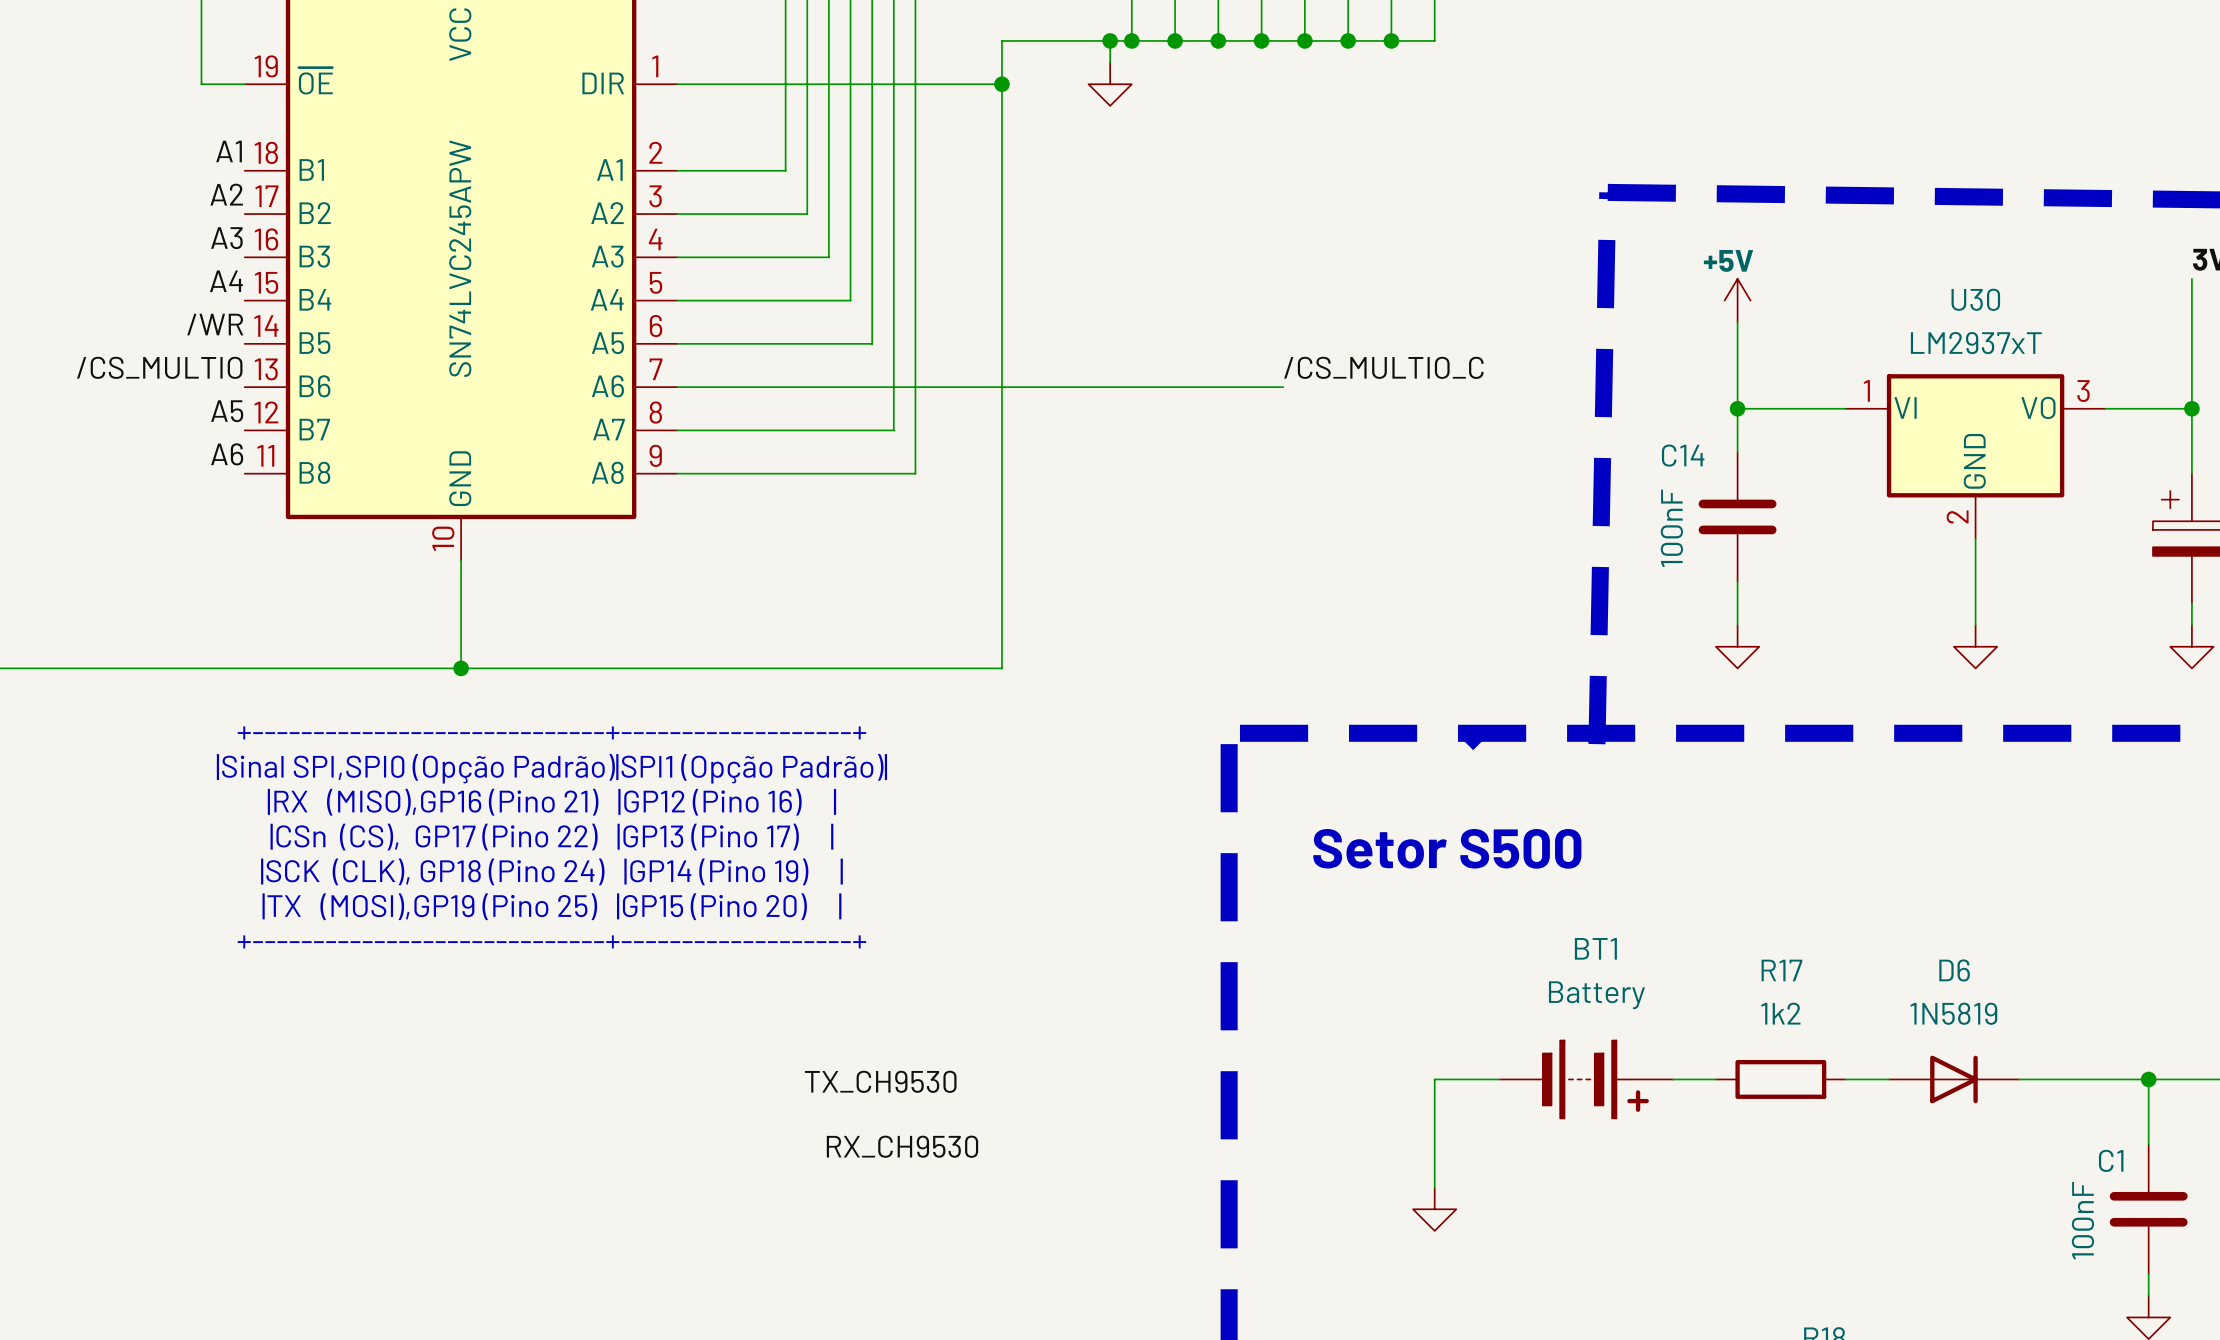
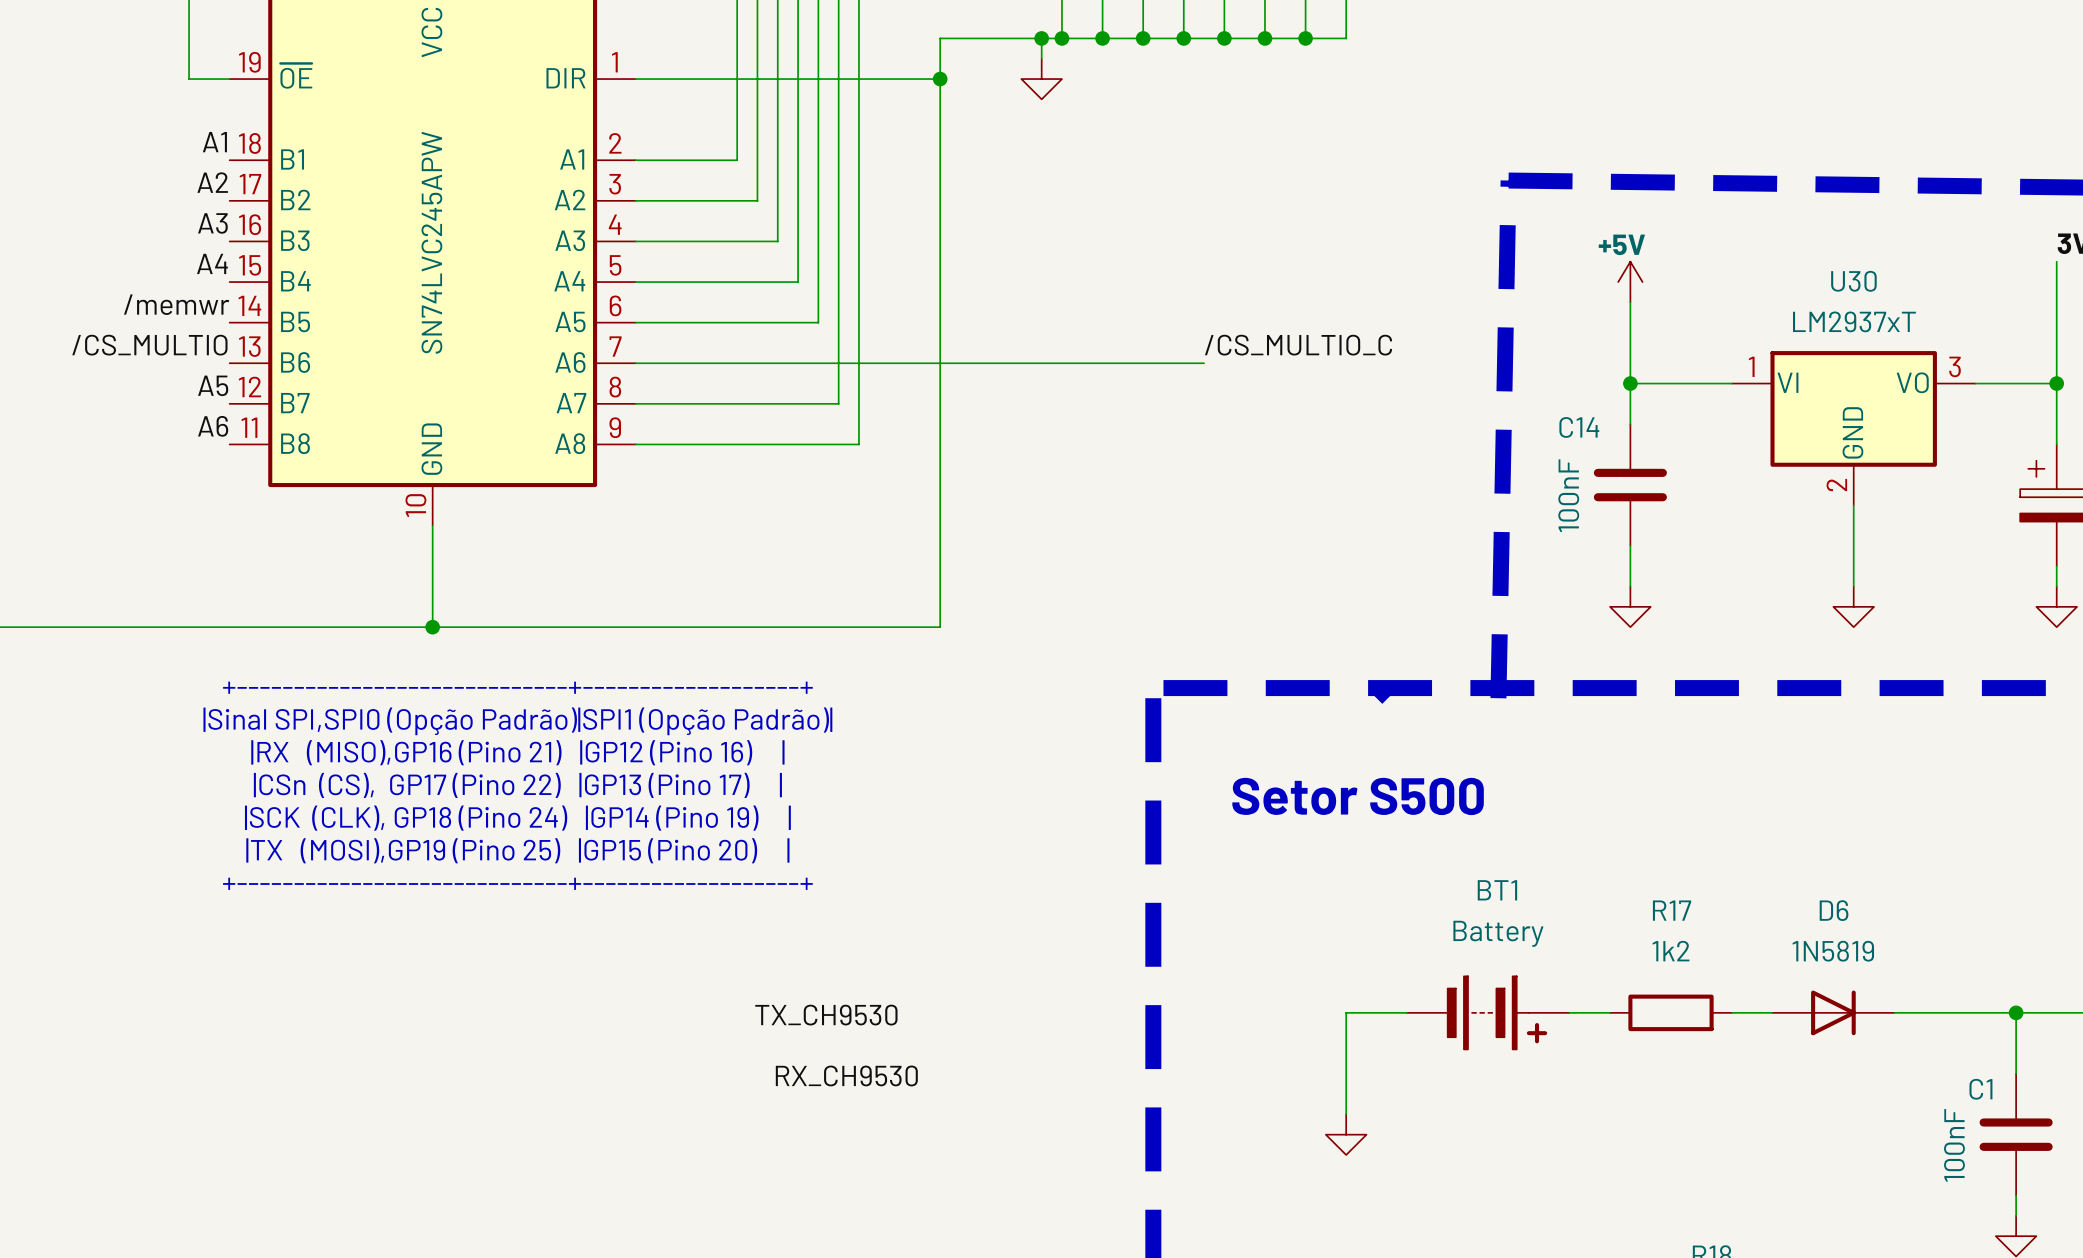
label: /WR (215, 324) -> /memwr (176, 304)

